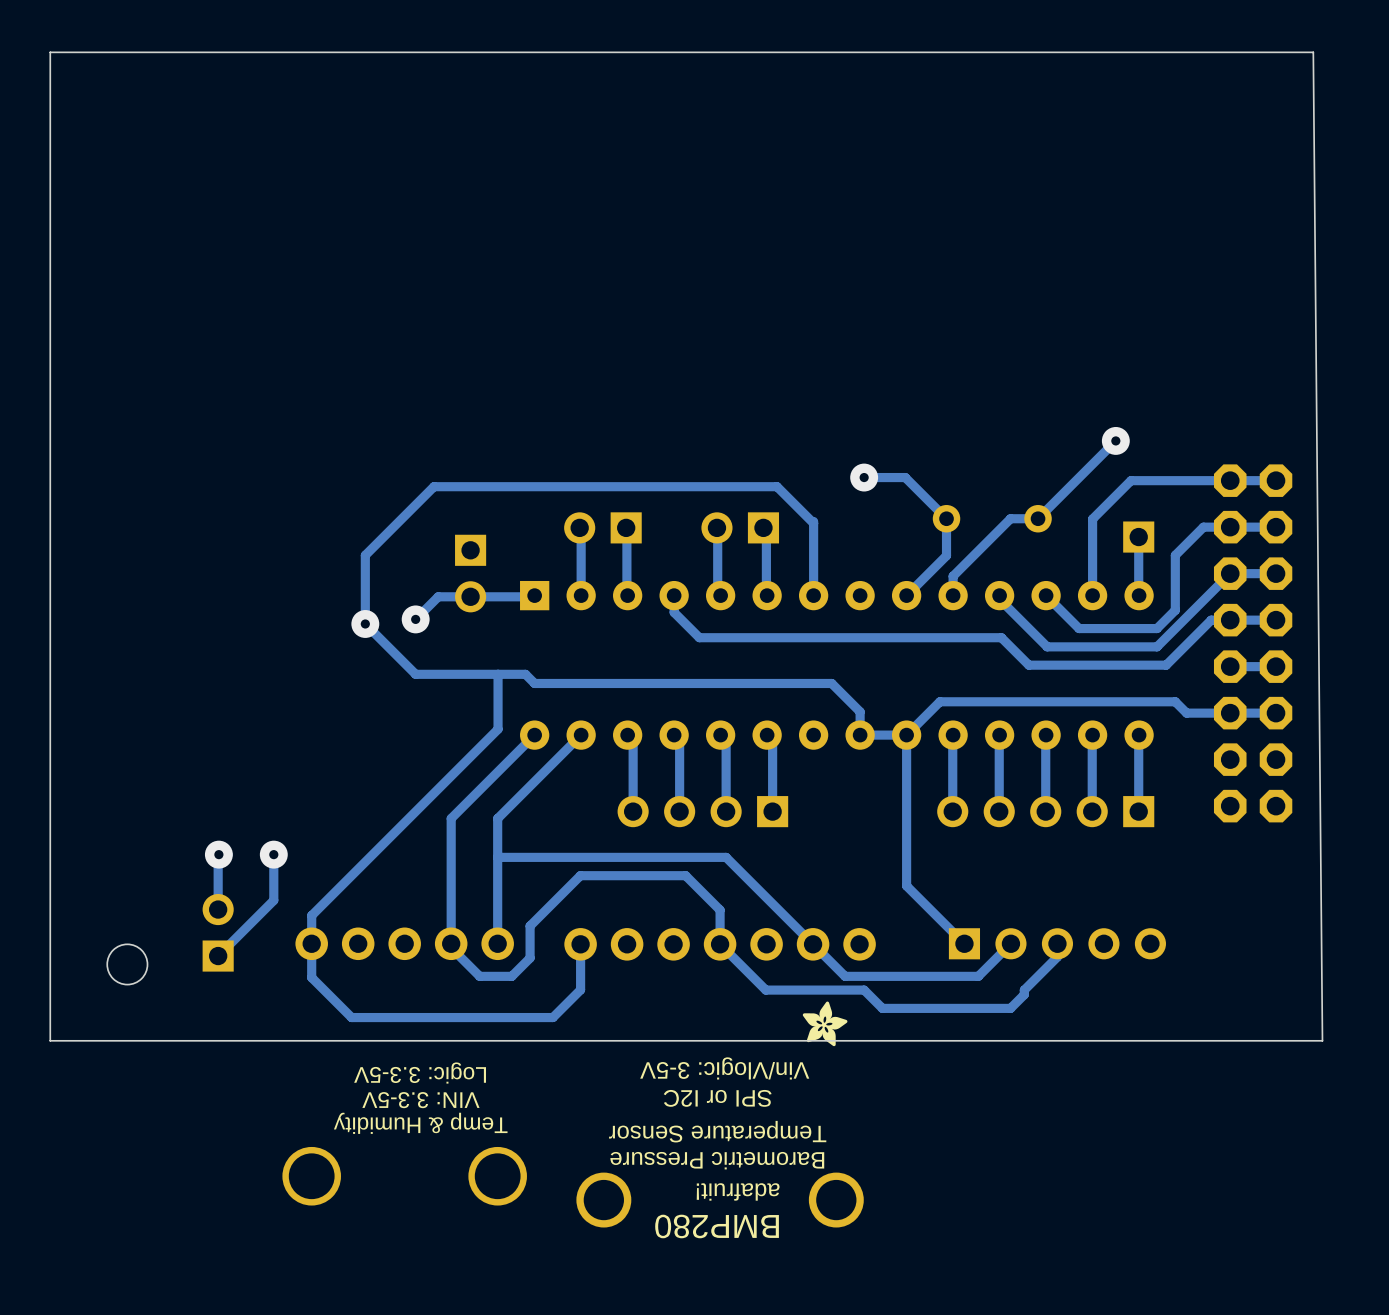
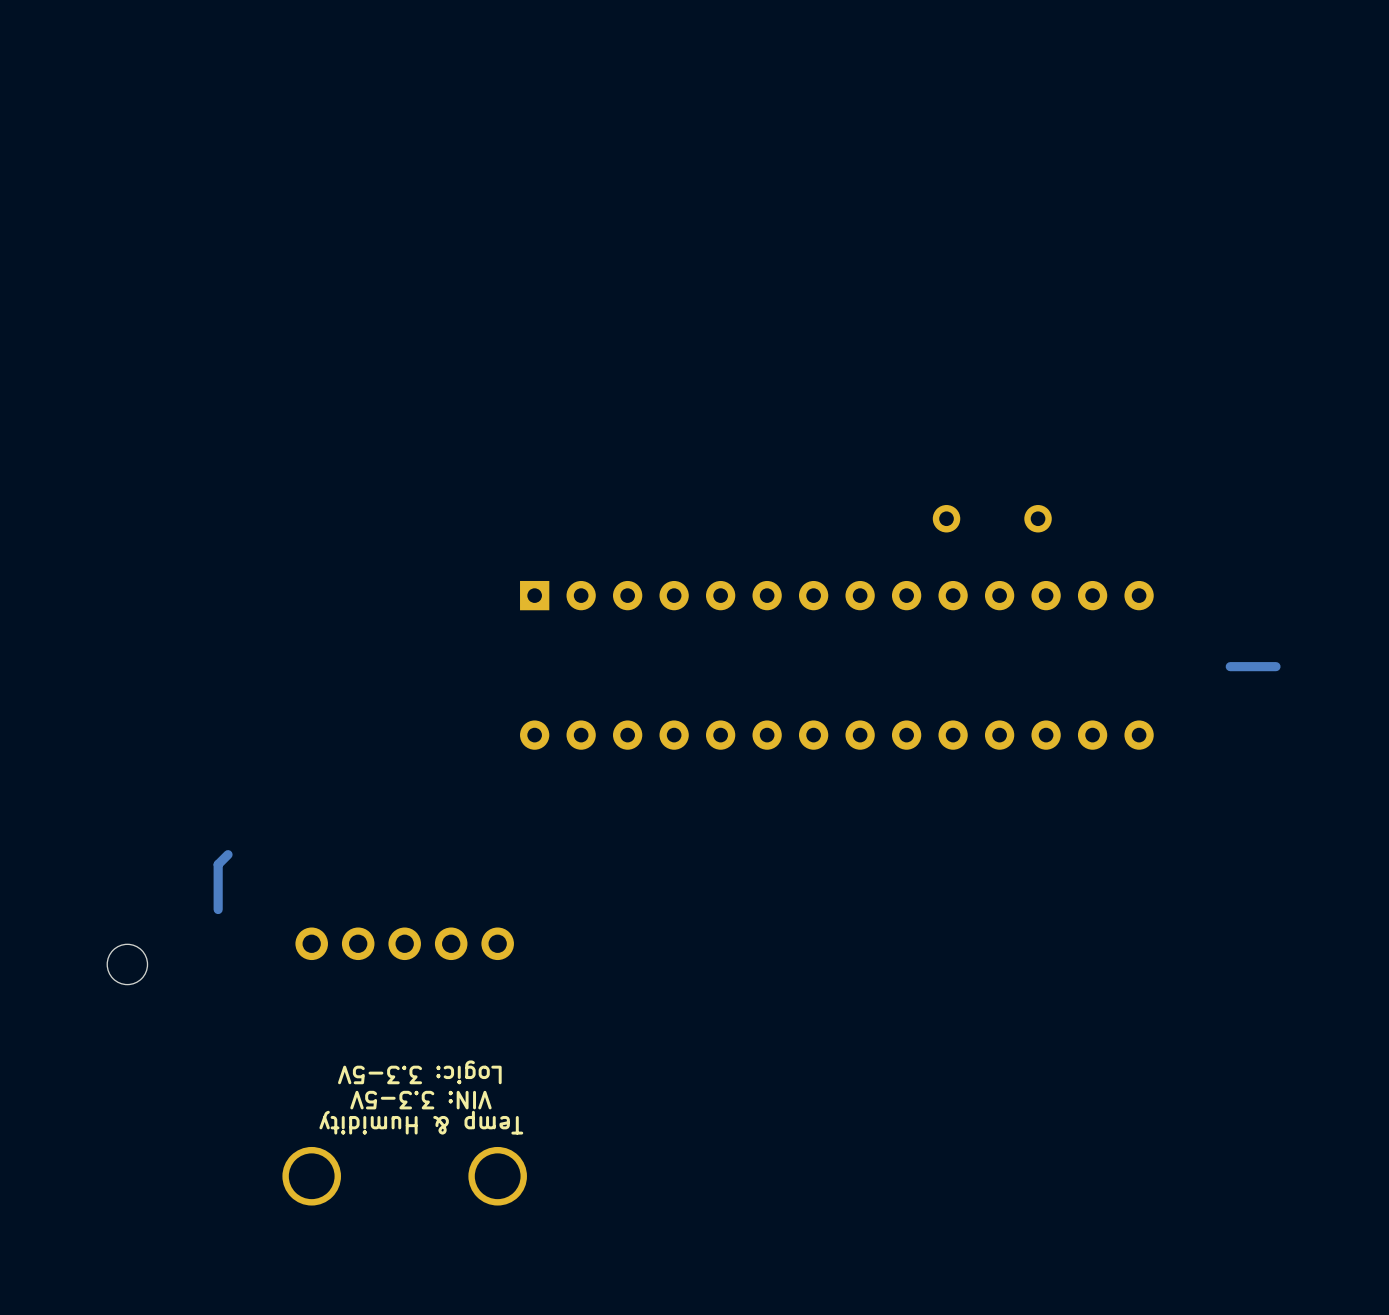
board edge: (1313, 52) (1322, 1040) (50, 1040) (50, 52) (1313, 52) -> none
track: (1115, 440) (1038, 518) (1010, 518) (953, 576) (953, 595) -> none
via: (1115, 440) -> none
track: (864, 477) (905, 477) (946, 518) (946, 555) (906, 595) -> none
via: (864, 477) -> none
track: (1276, 480) (1131, 480) (1092, 519) (1092, 595) -> none
track: (813, 521) (813, 595) (819, 589) -> none
track: (813, 523) (777, 486) (433, 486) (365, 555) (365, 623) (415, 674) (525, 674) (534, 683) (831, 683) (860, 711) (860, 735) (906, 735) (939, 701) (1175, 701) (1186, 713) (1276, 713) -> none
part: (602, 527) -> none
part: (740, 527) -> none
track: (1276, 527) (1203, 527) (1175, 555) (1175, 610) (1157, 628) (1079, 628) (1046, 595) -> none
track: (580, 537) (581, 595) -> none
track: (626, 537) (627, 595) -> none
track: (717, 537) (717, 601) -> none
track: (766, 537) (767, 595) -> none
track: (1138, 537) (1139, 595) -> none
part: (1138, 537) -> none
part: (470, 573) -> none
track: (1276, 573) (1230, 573) (1157, 646) (1047, 646) (999, 599) (999, 595) (1006, 595) -> none
track: (534, 595) (438, 596) (415, 619) -> none
track: (674, 595) (674, 612) (699, 637) (1001, 637) (1028, 665) (1166, 665) (1211, 620) (1276, 620) -> none
via: (415, 619) -> none
via: (365, 623) -> none
part: (1253, 643) -> none
track: (498, 674) (498, 729) (311, 915) (311, 977) (351, 1017) (552, 1017) (580, 989) (580, 944) -> none
track: (906, 732) (906, 885) (964, 943) -> none
track: (534, 735) (451, 818) (451, 947) (479, 976) (511, 976) (530, 958) (530, 926) (580, 875) (685, 875) (720, 910) (720, 944) (765, 990) (864, 990) (882, 1008) (1010, 1008) (1024, 994) (1024, 990) (1057, 956) (1057, 943) -> none
track: (581, 735) (497, 818) (497, 943) -> none
track: (627, 735) (633, 740) (633, 802) -> none
track: (674, 735) (679, 740) (679, 802) -> none
track: (720, 735) (726, 740) (726, 802) -> none
track: (767, 735) (772, 740) (772, 802) -> none
track: (953, 735) (952, 811) -> none
track: (999, 735) (999, 811) -> none
track: (1046, 735) (1045, 811) -> none
track: (1092, 735) (1092, 811) -> none
track: (1139, 735) (1138, 811) -> none
part: (702, 811) -> none
part: (1045, 811) -> none
via: (218, 854) -> none
track: (273, 854) (273, 900) (218, 956) -> none
via: (273, 854) -> none
track: (497, 857) (726, 857) (845, 976) (978, 976) (1010, 943) -> none
part: (218, 932) -> none
part: (1057, 943) -> none
part: (720, 1077) -> none

